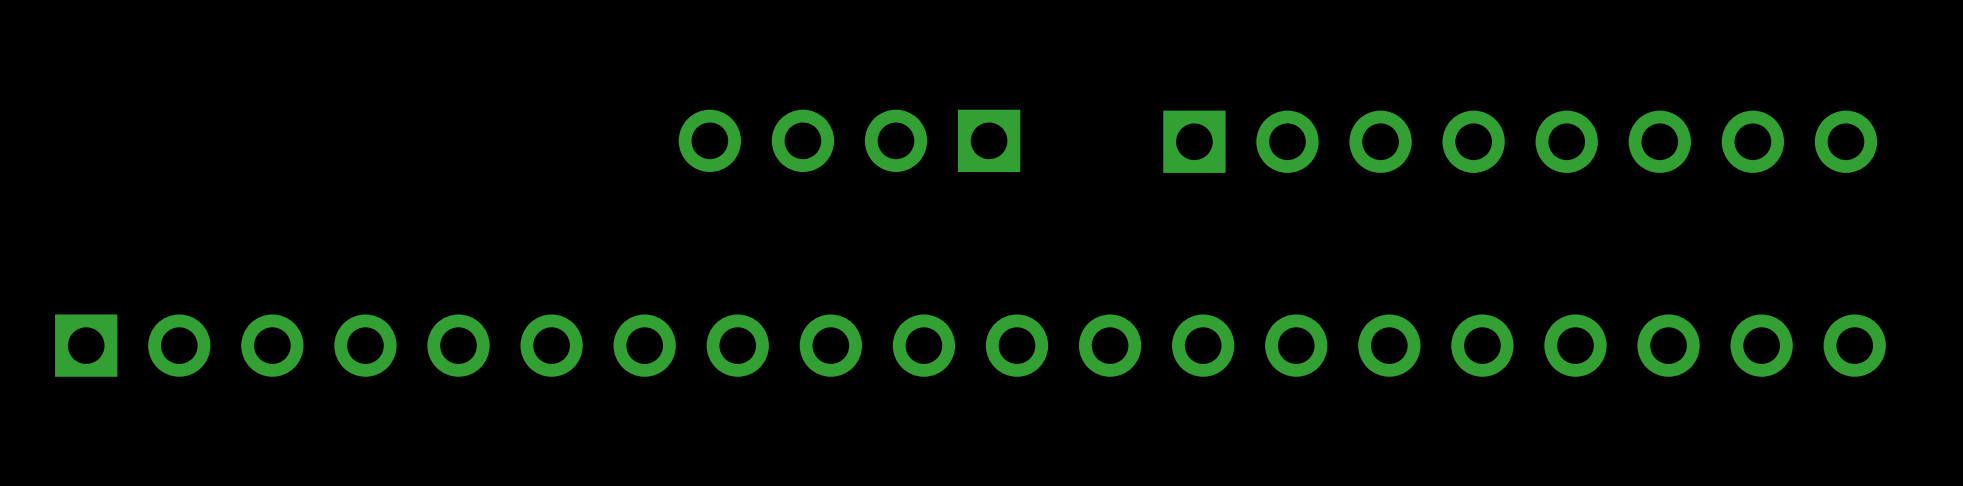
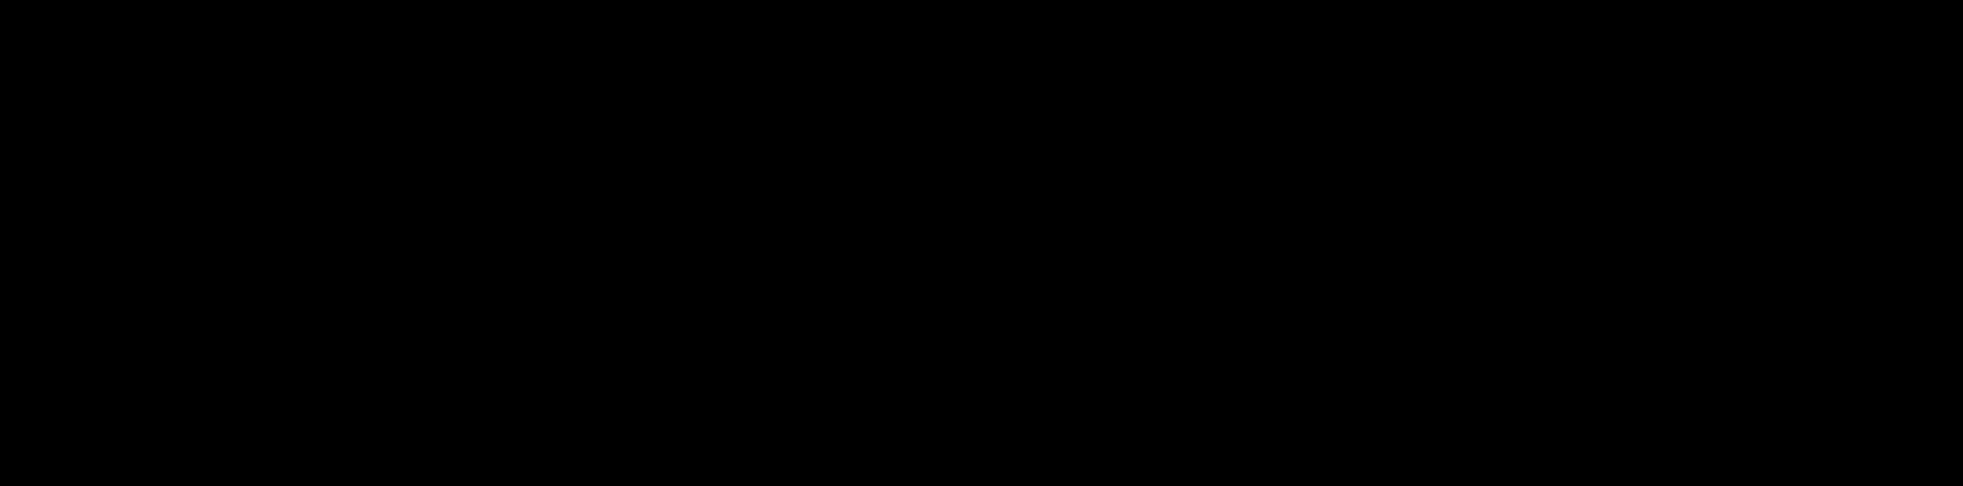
part: (849, 140) -> none
part: (1520, 141) -> none
part: (970, 345) -> none

